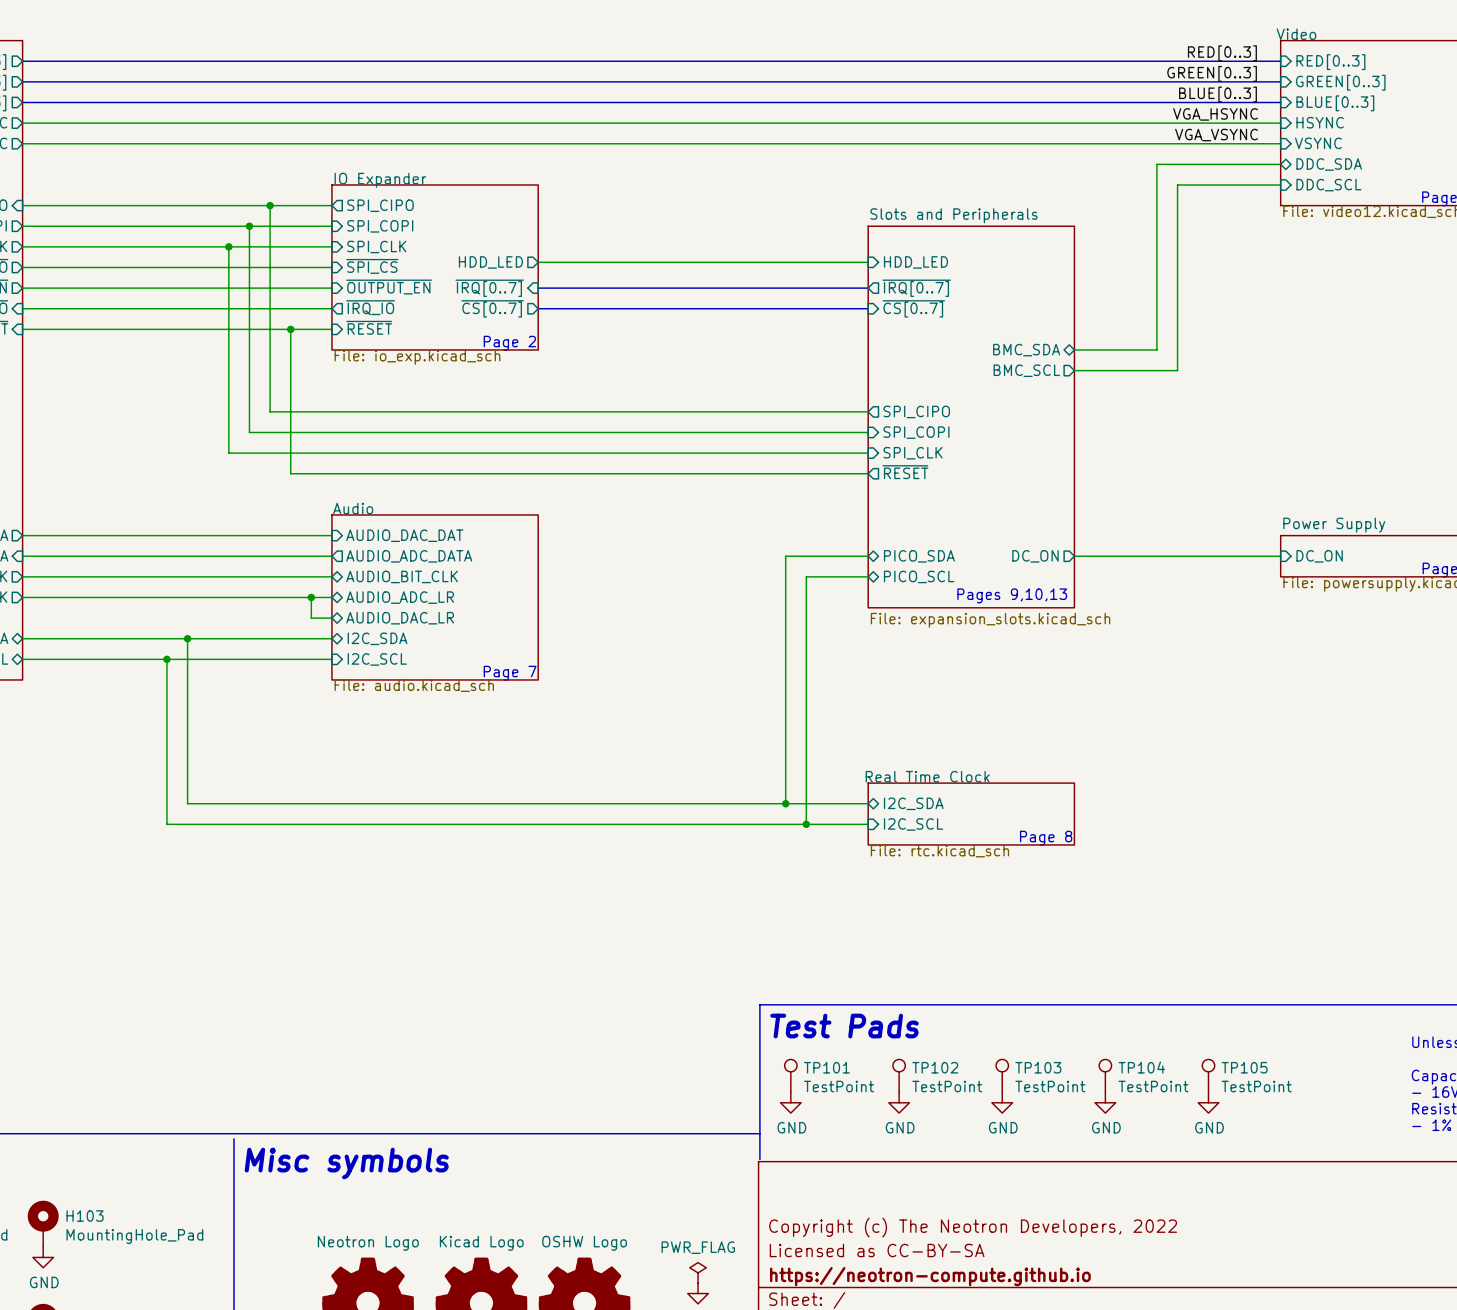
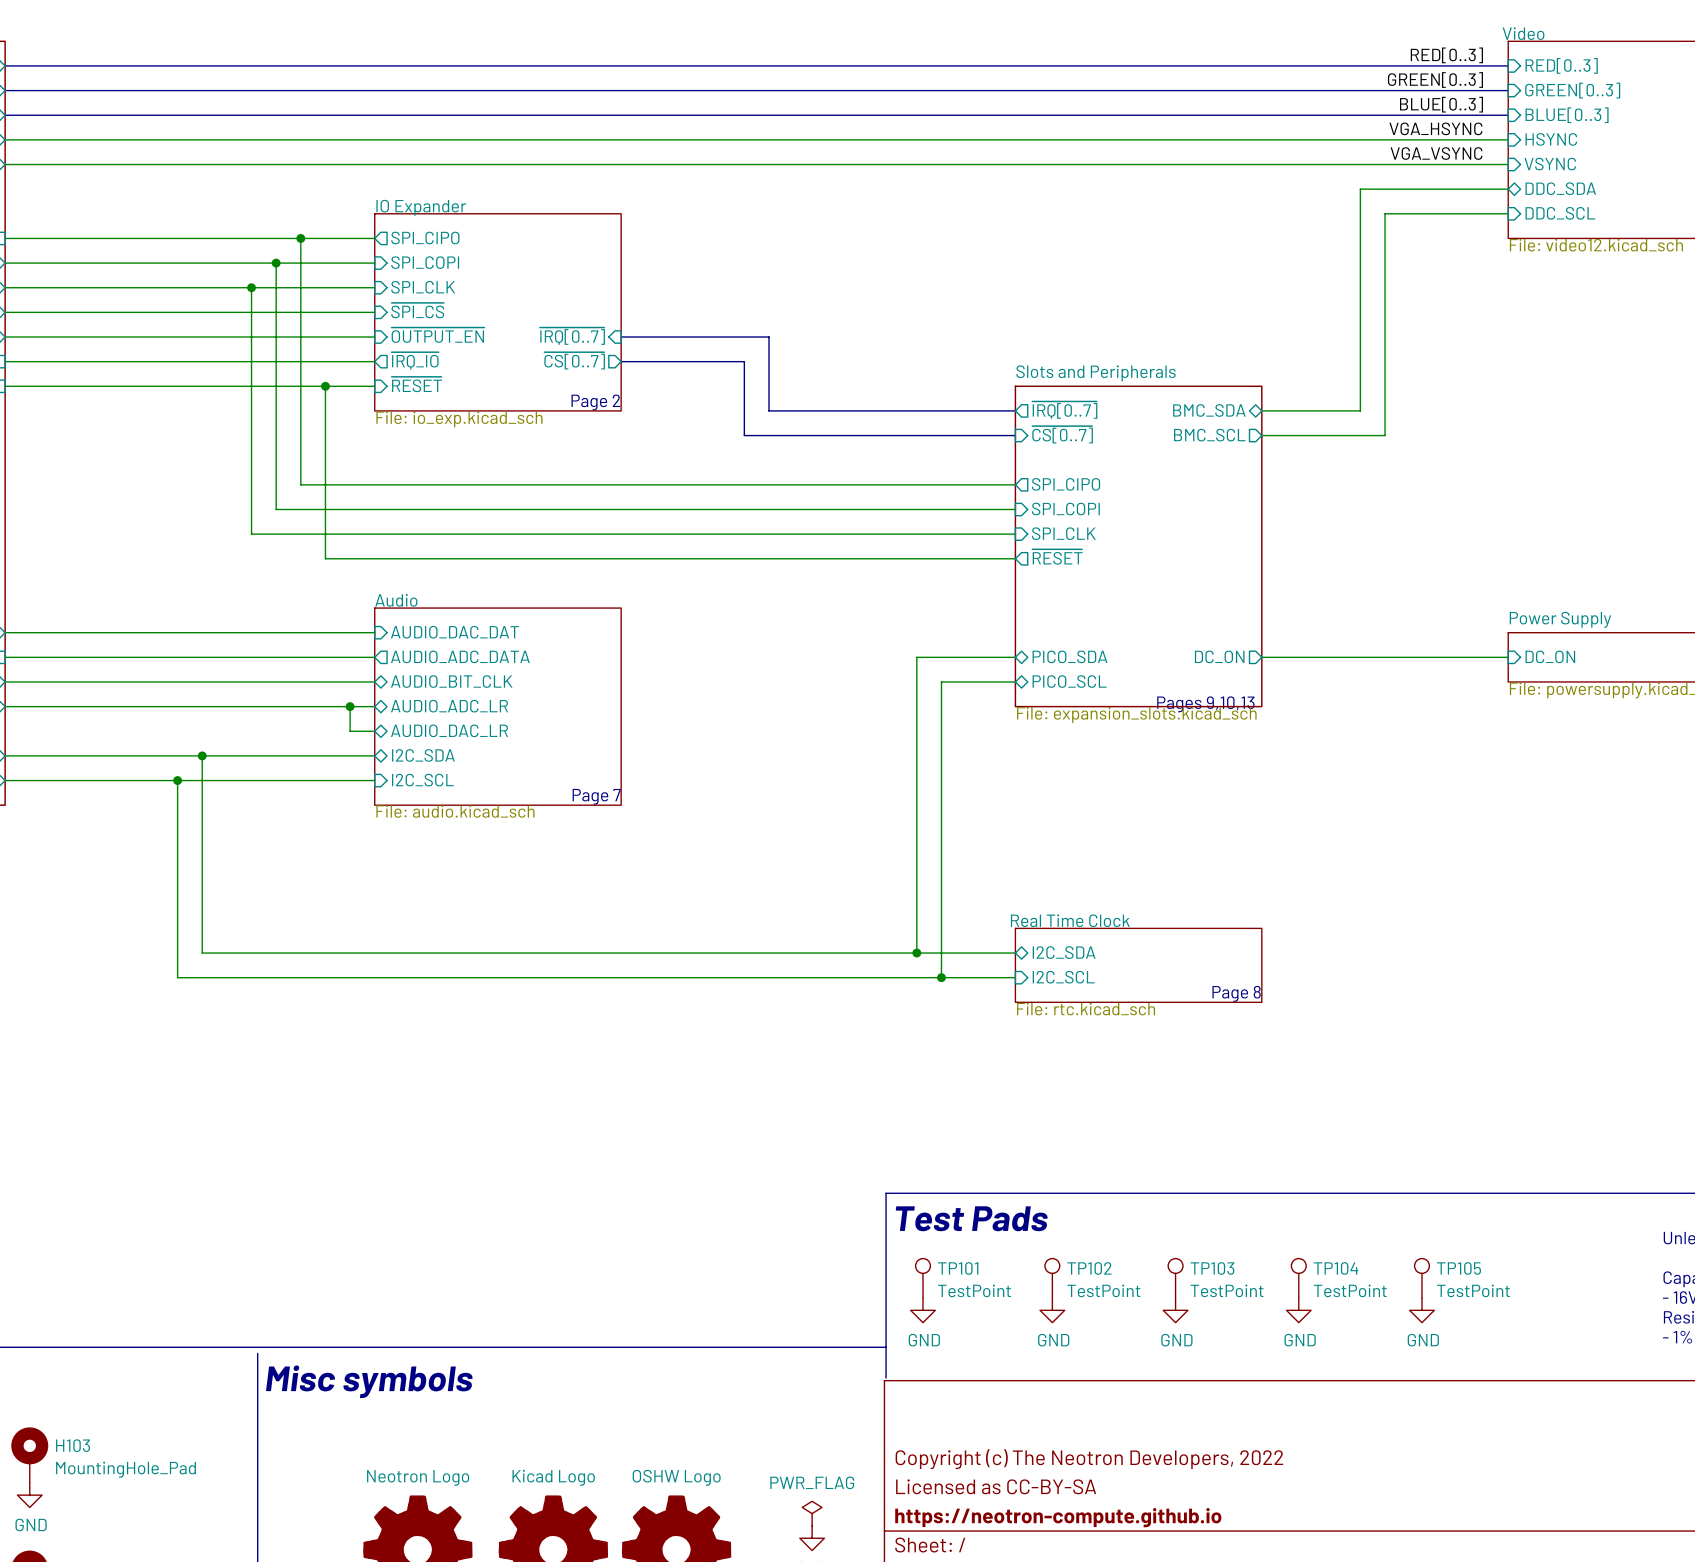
sheet pin: HDD_LED (490, 262) -> none
wire: (538, 262) (868, 262) -> none
sheet pin: HDD_LED (915, 262) -> none
bus: (661, 288) (868, 288) -> (768, 337) (768, 410) (1015, 410)
sheet pin position: ~{IRQ[0..7]} (916, 288) -> ~{IRQ[0..7]} (1064, 410)
bus: (641, 308) (868, 308) -> (744, 361) (744, 435) (1015, 435)
sheet pin position: ~{CS[0..7]} (913, 308) -> ~{CS[0..7]} (1062, 434)
sheet Slots and Peripherals: File: expansion_slots.kicad_sch (971, 417) -> none
sheet Slots and Peripherals: none -> File: expansion_slots.kicad_sch (1138, 546)

